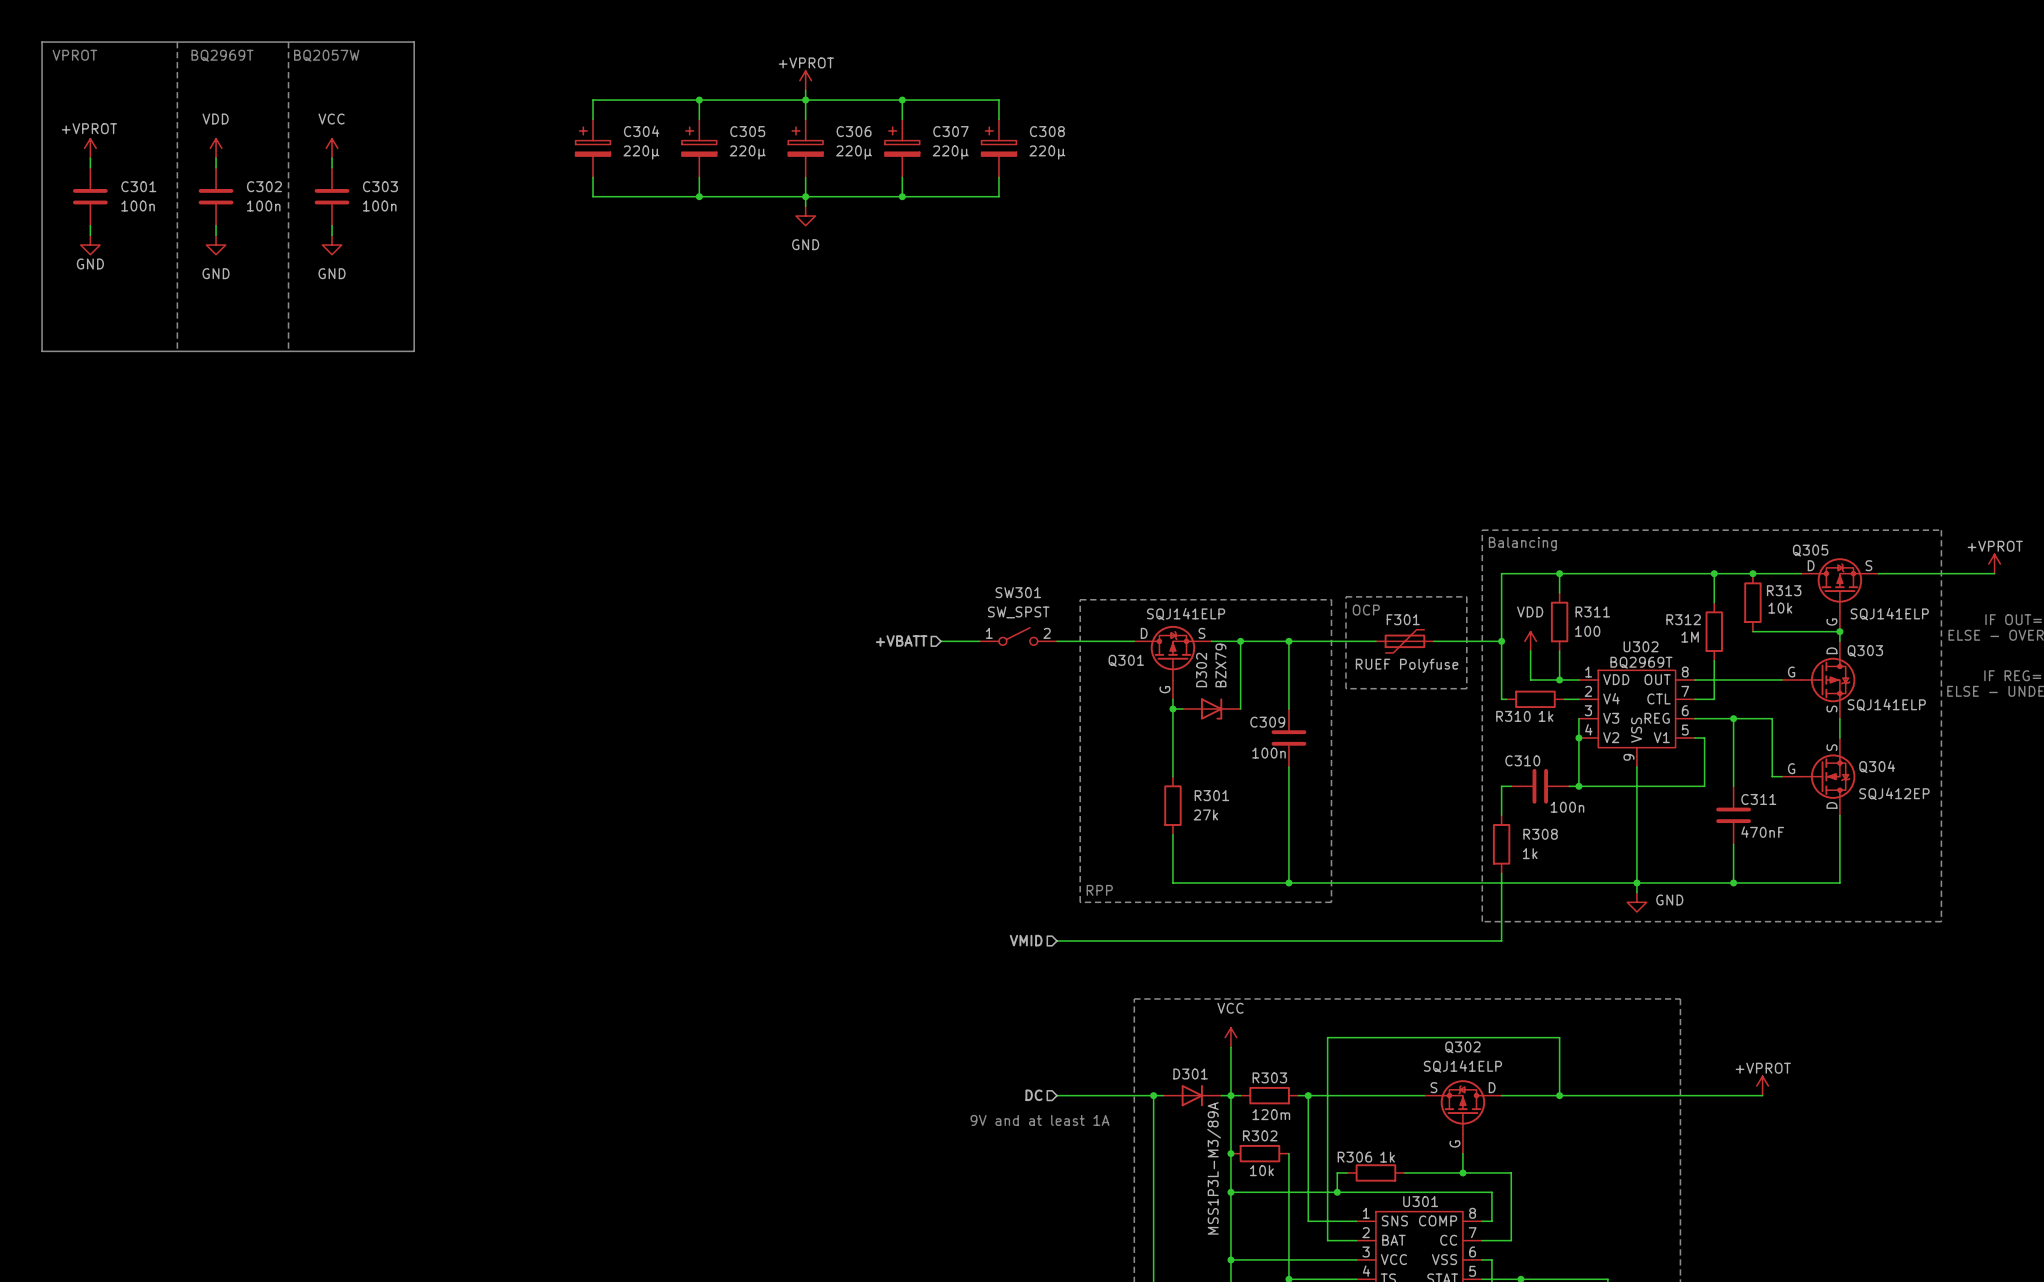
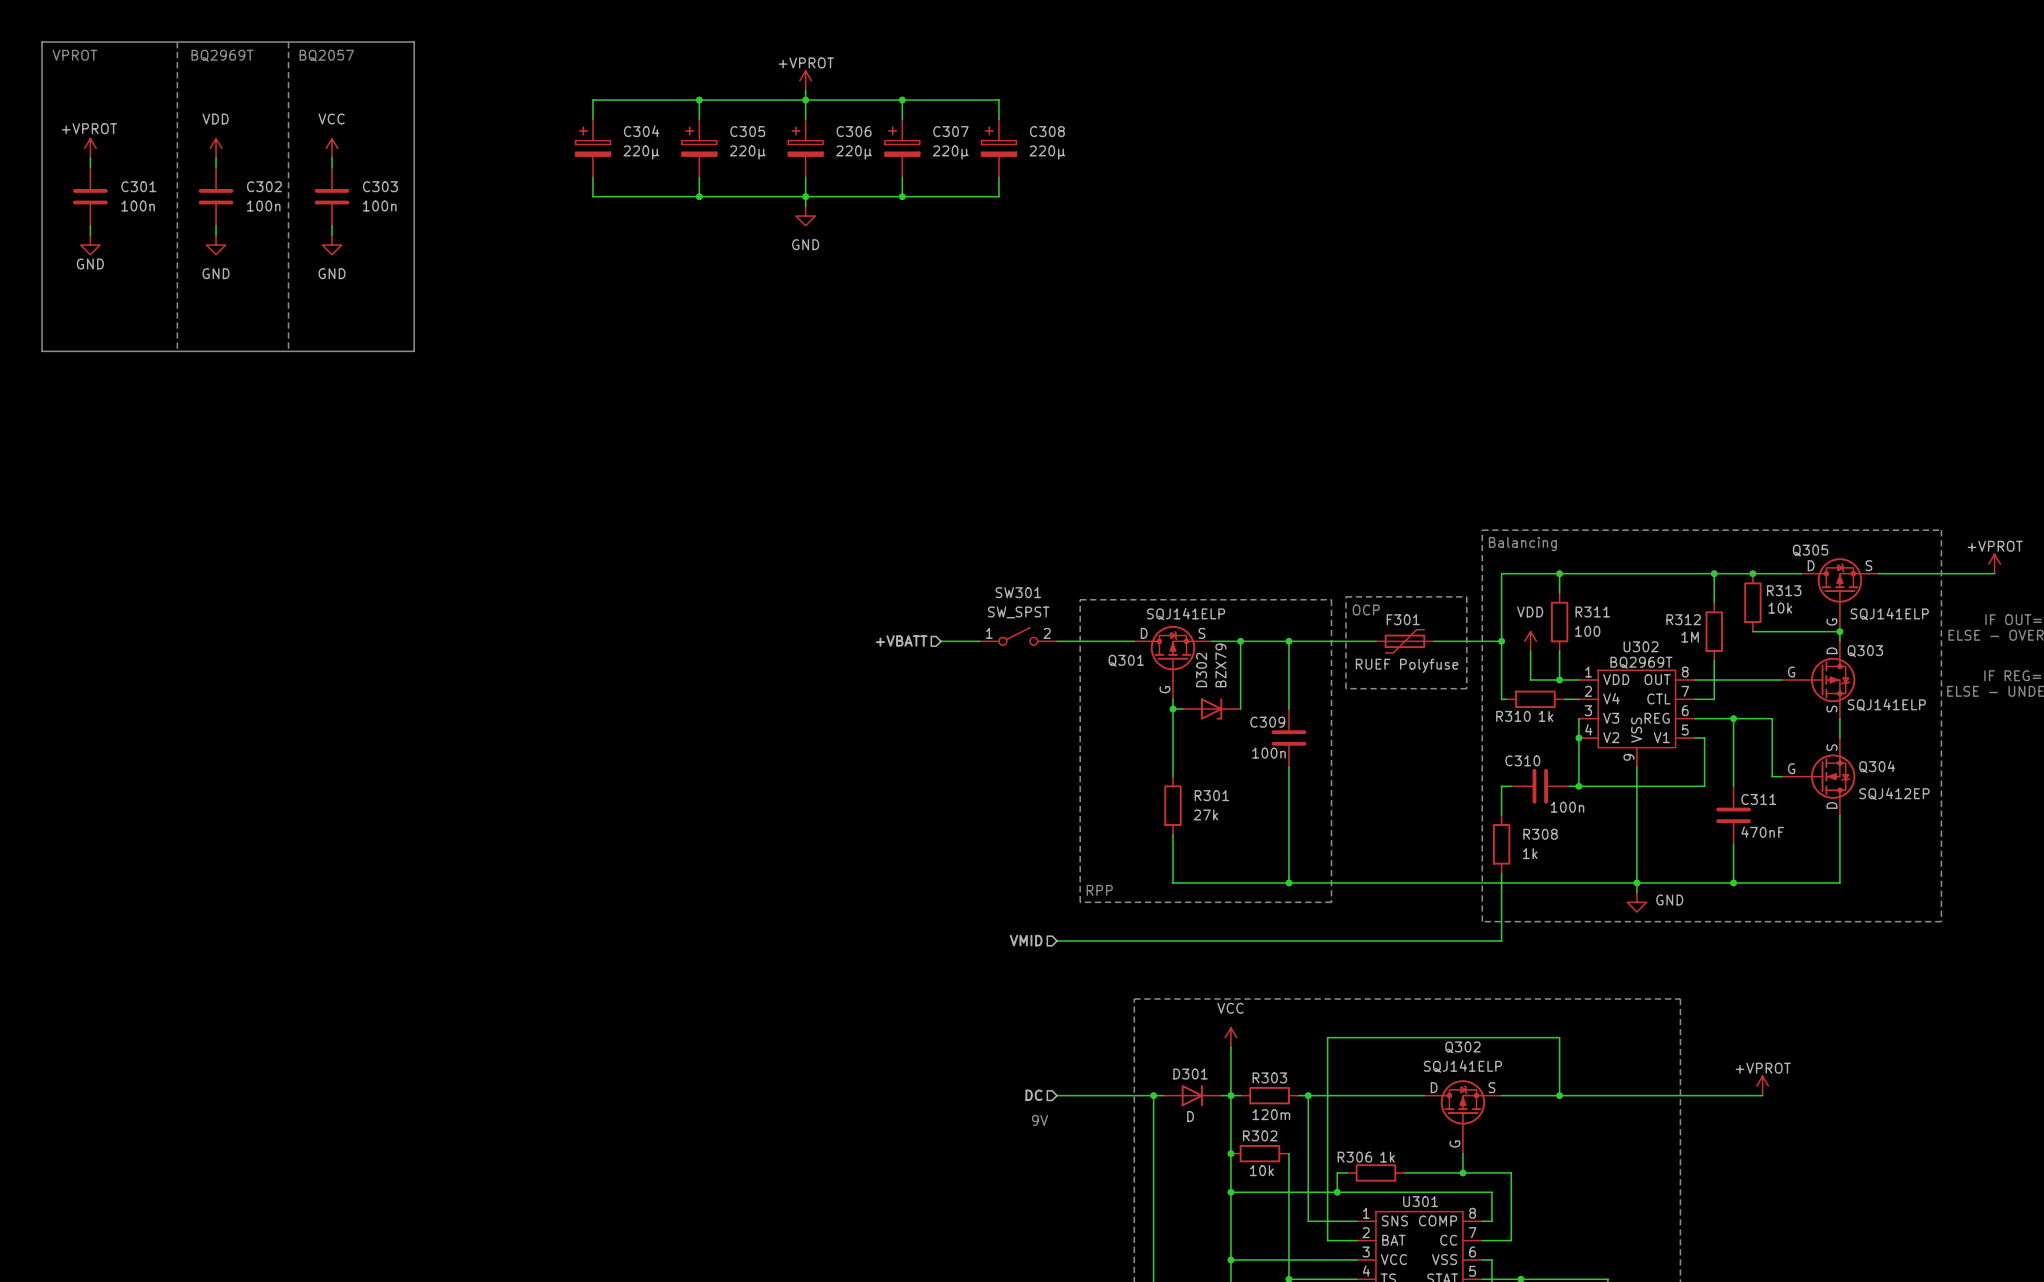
text: BQ2057W (326, 55) -> BQ2057 (326, 55)
Q302 flip: as is (1462, 1107) -> left-right (1462, 1107)
text: 9V and at least 1A (1040, 1120) -> 9V (1040, 1120)
D301 value: MSS1P3L-M3/89A (1214, 1168) -> D (1190, 1116)

